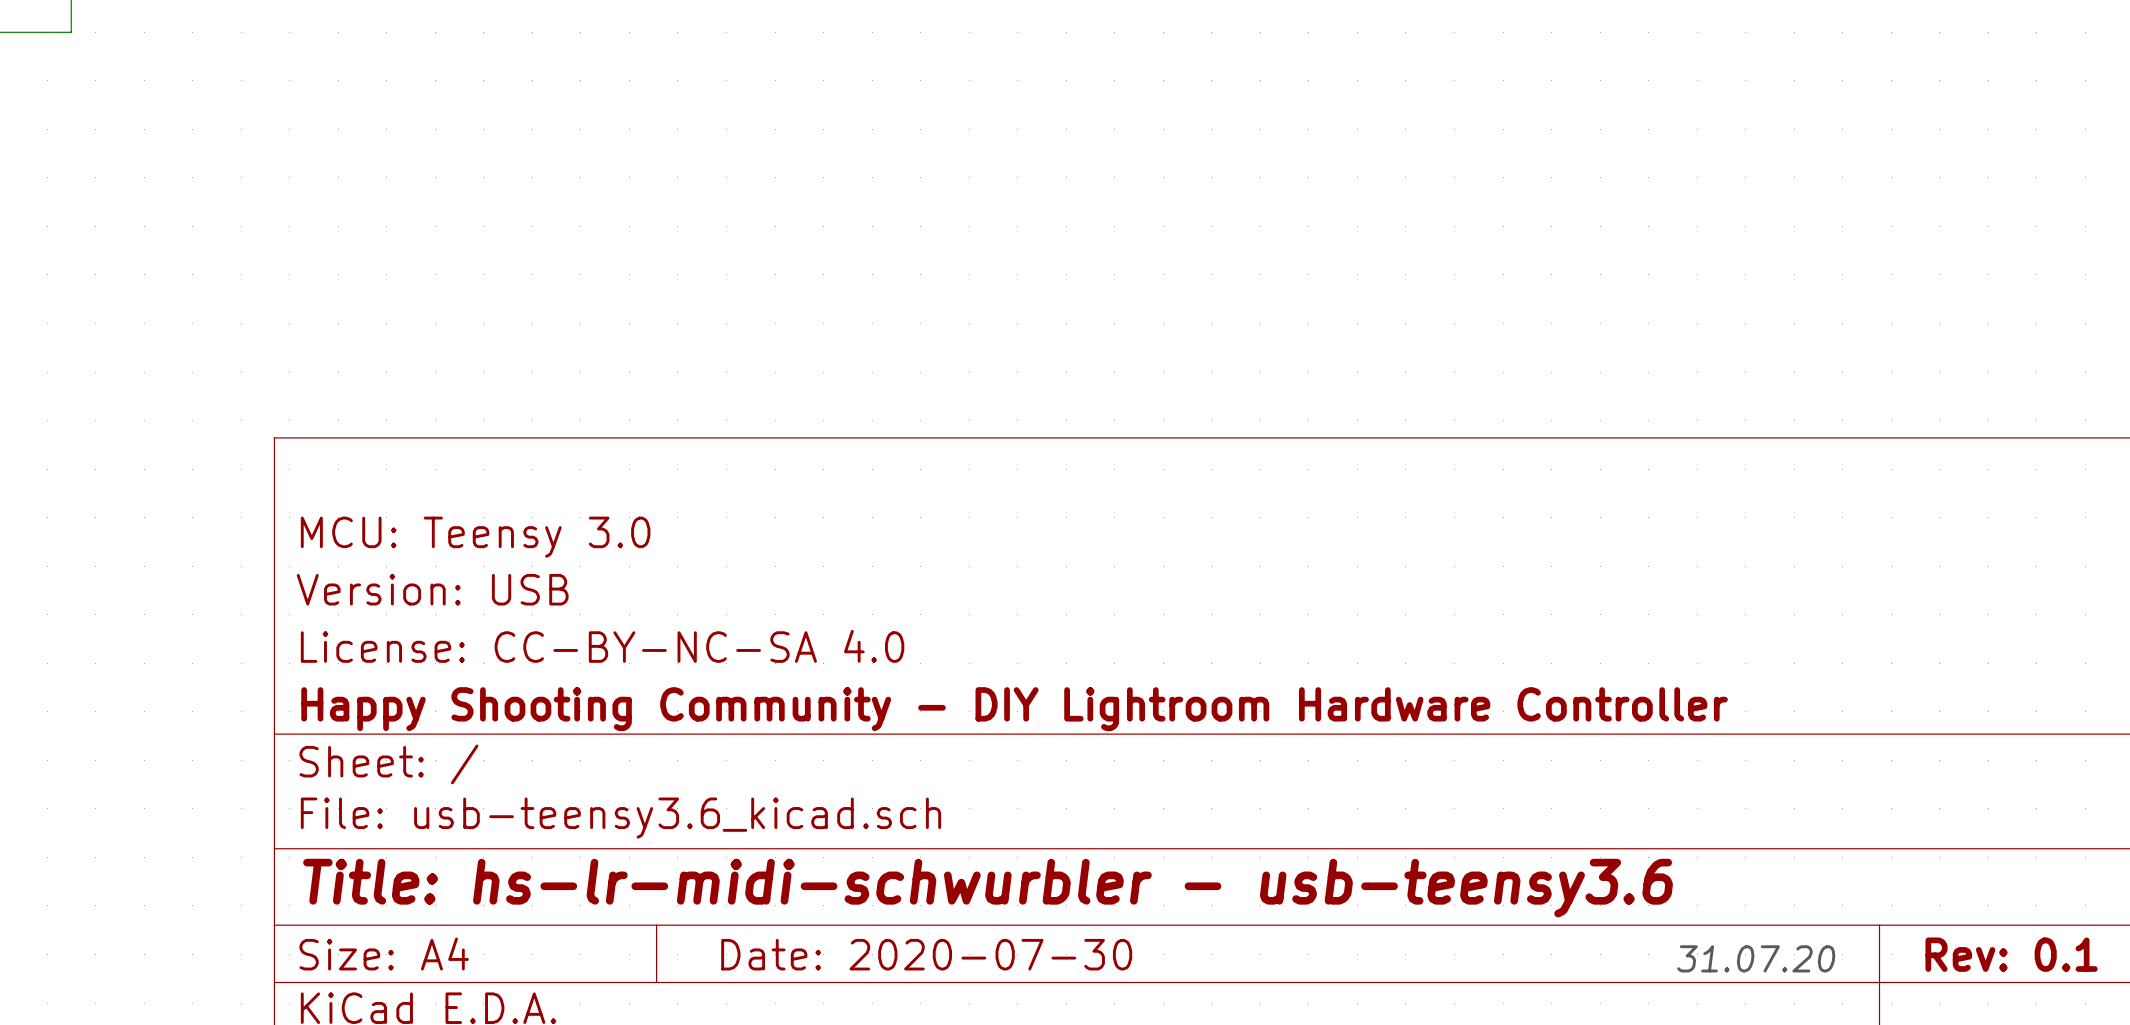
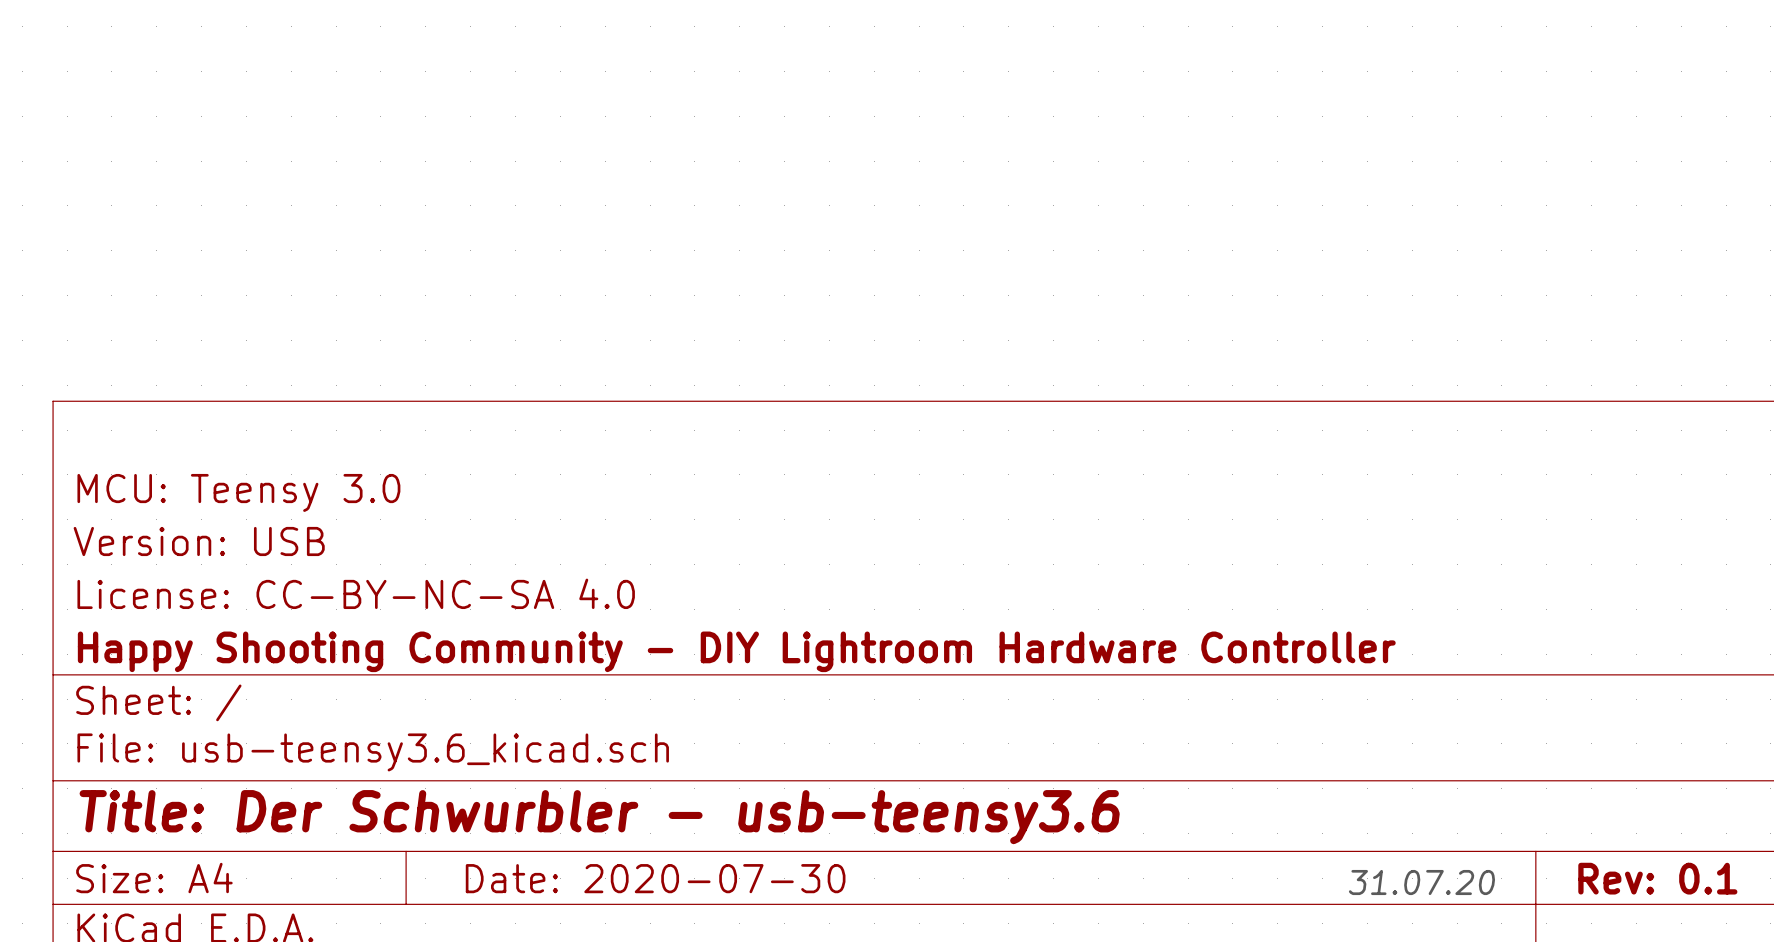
title block: Title: hs-lr-midi-schwurbler - usb-teensy3.6 (988, 888) -> Title: Der Schwurbler - usb-teensy3.6 (599, 817)

